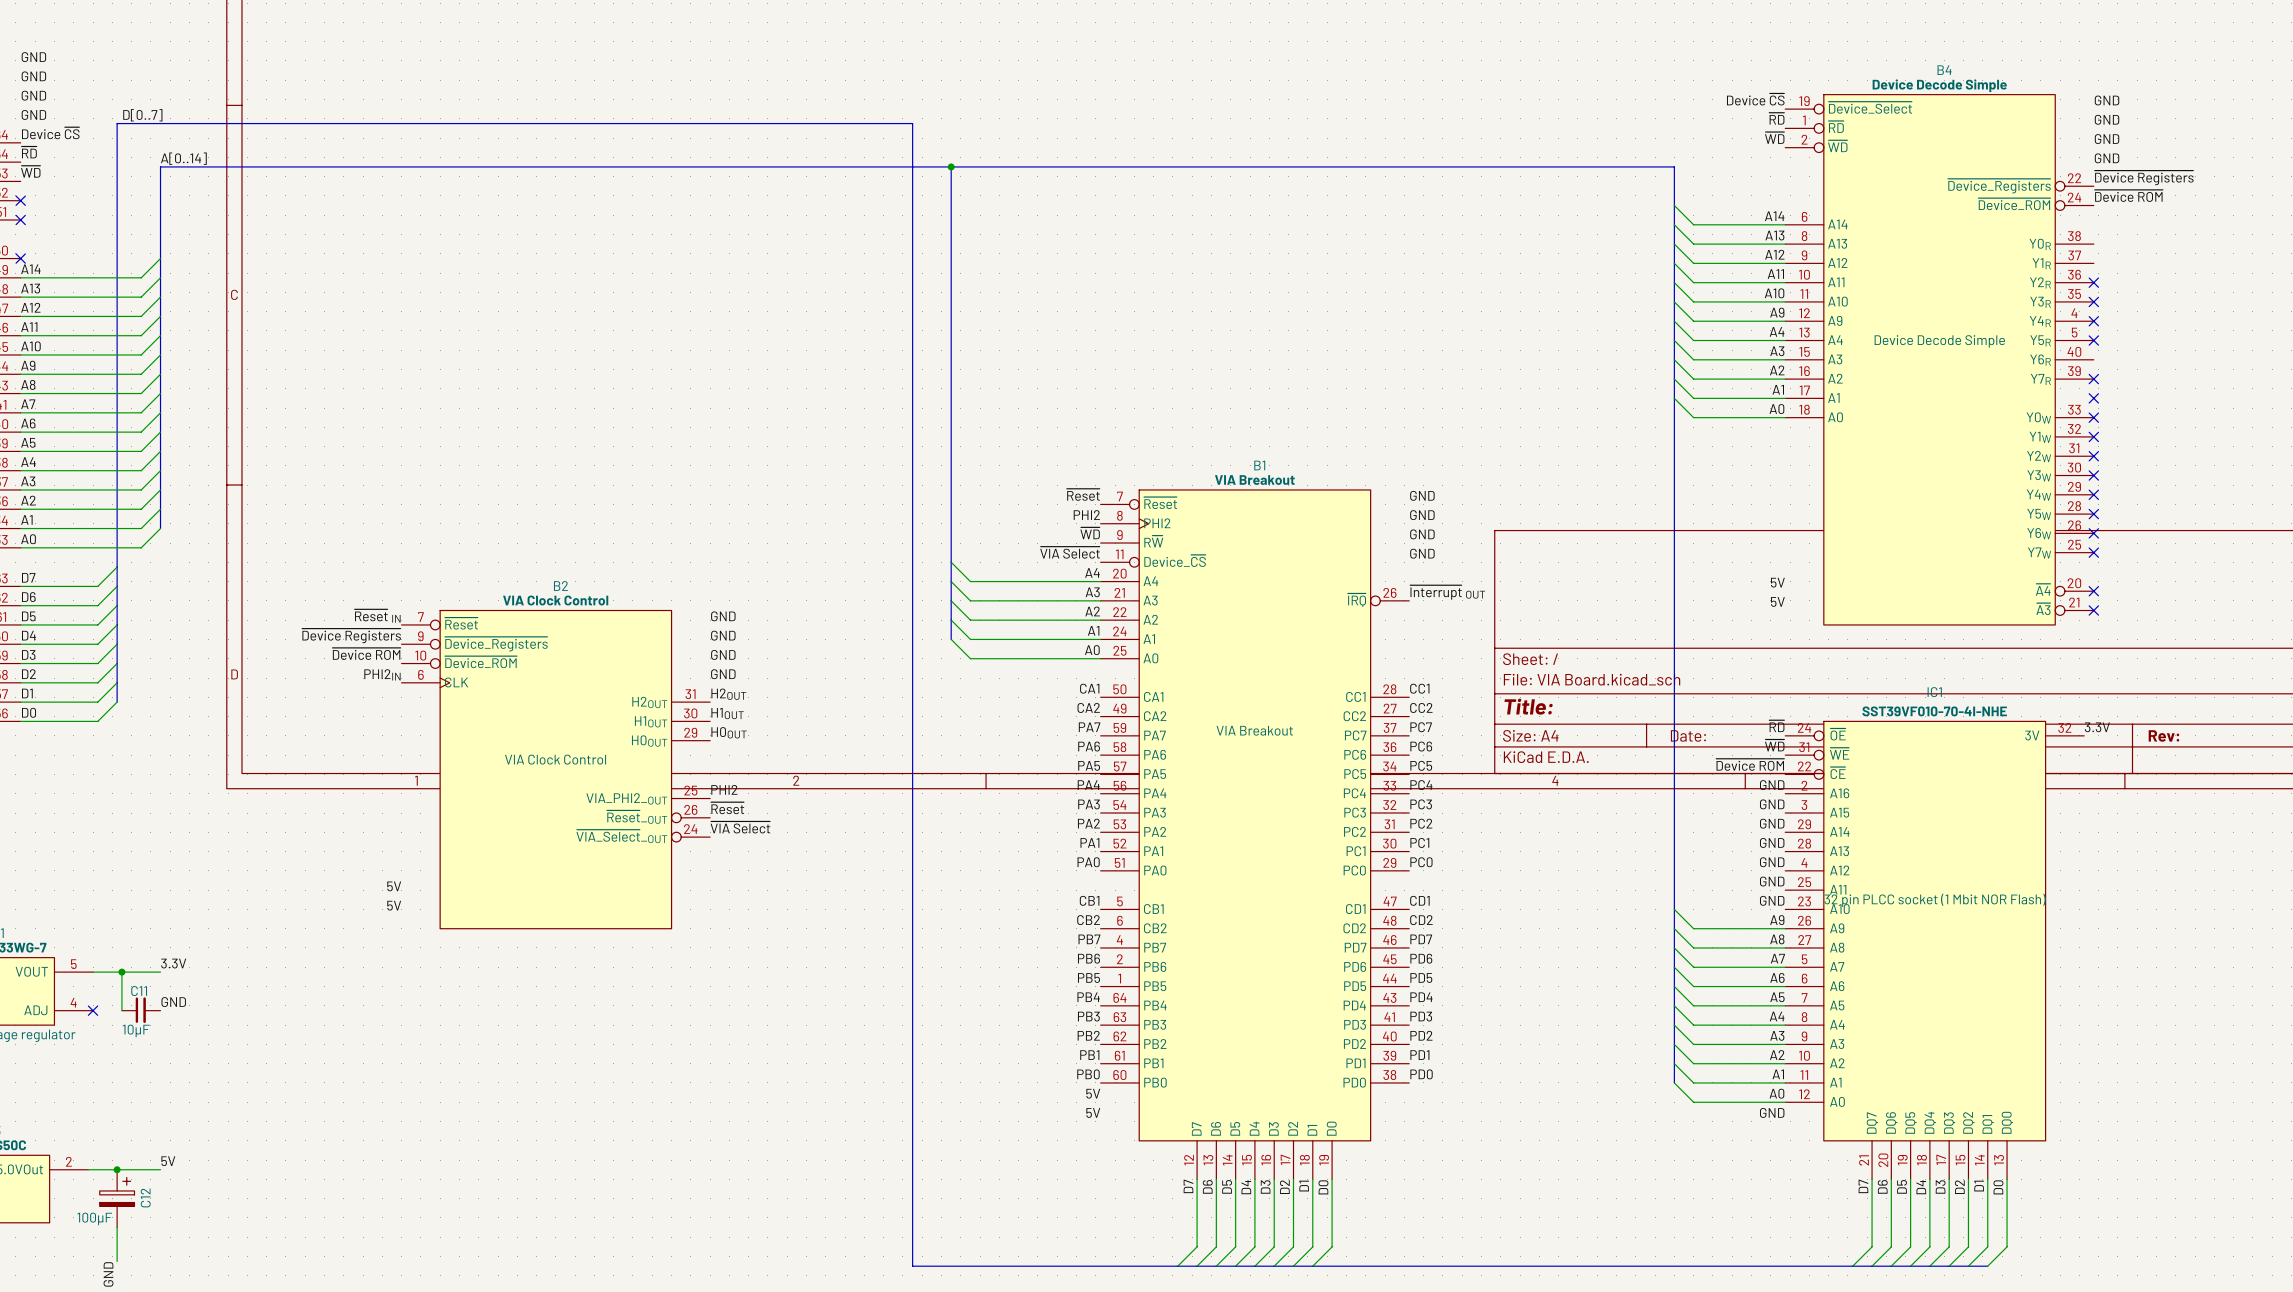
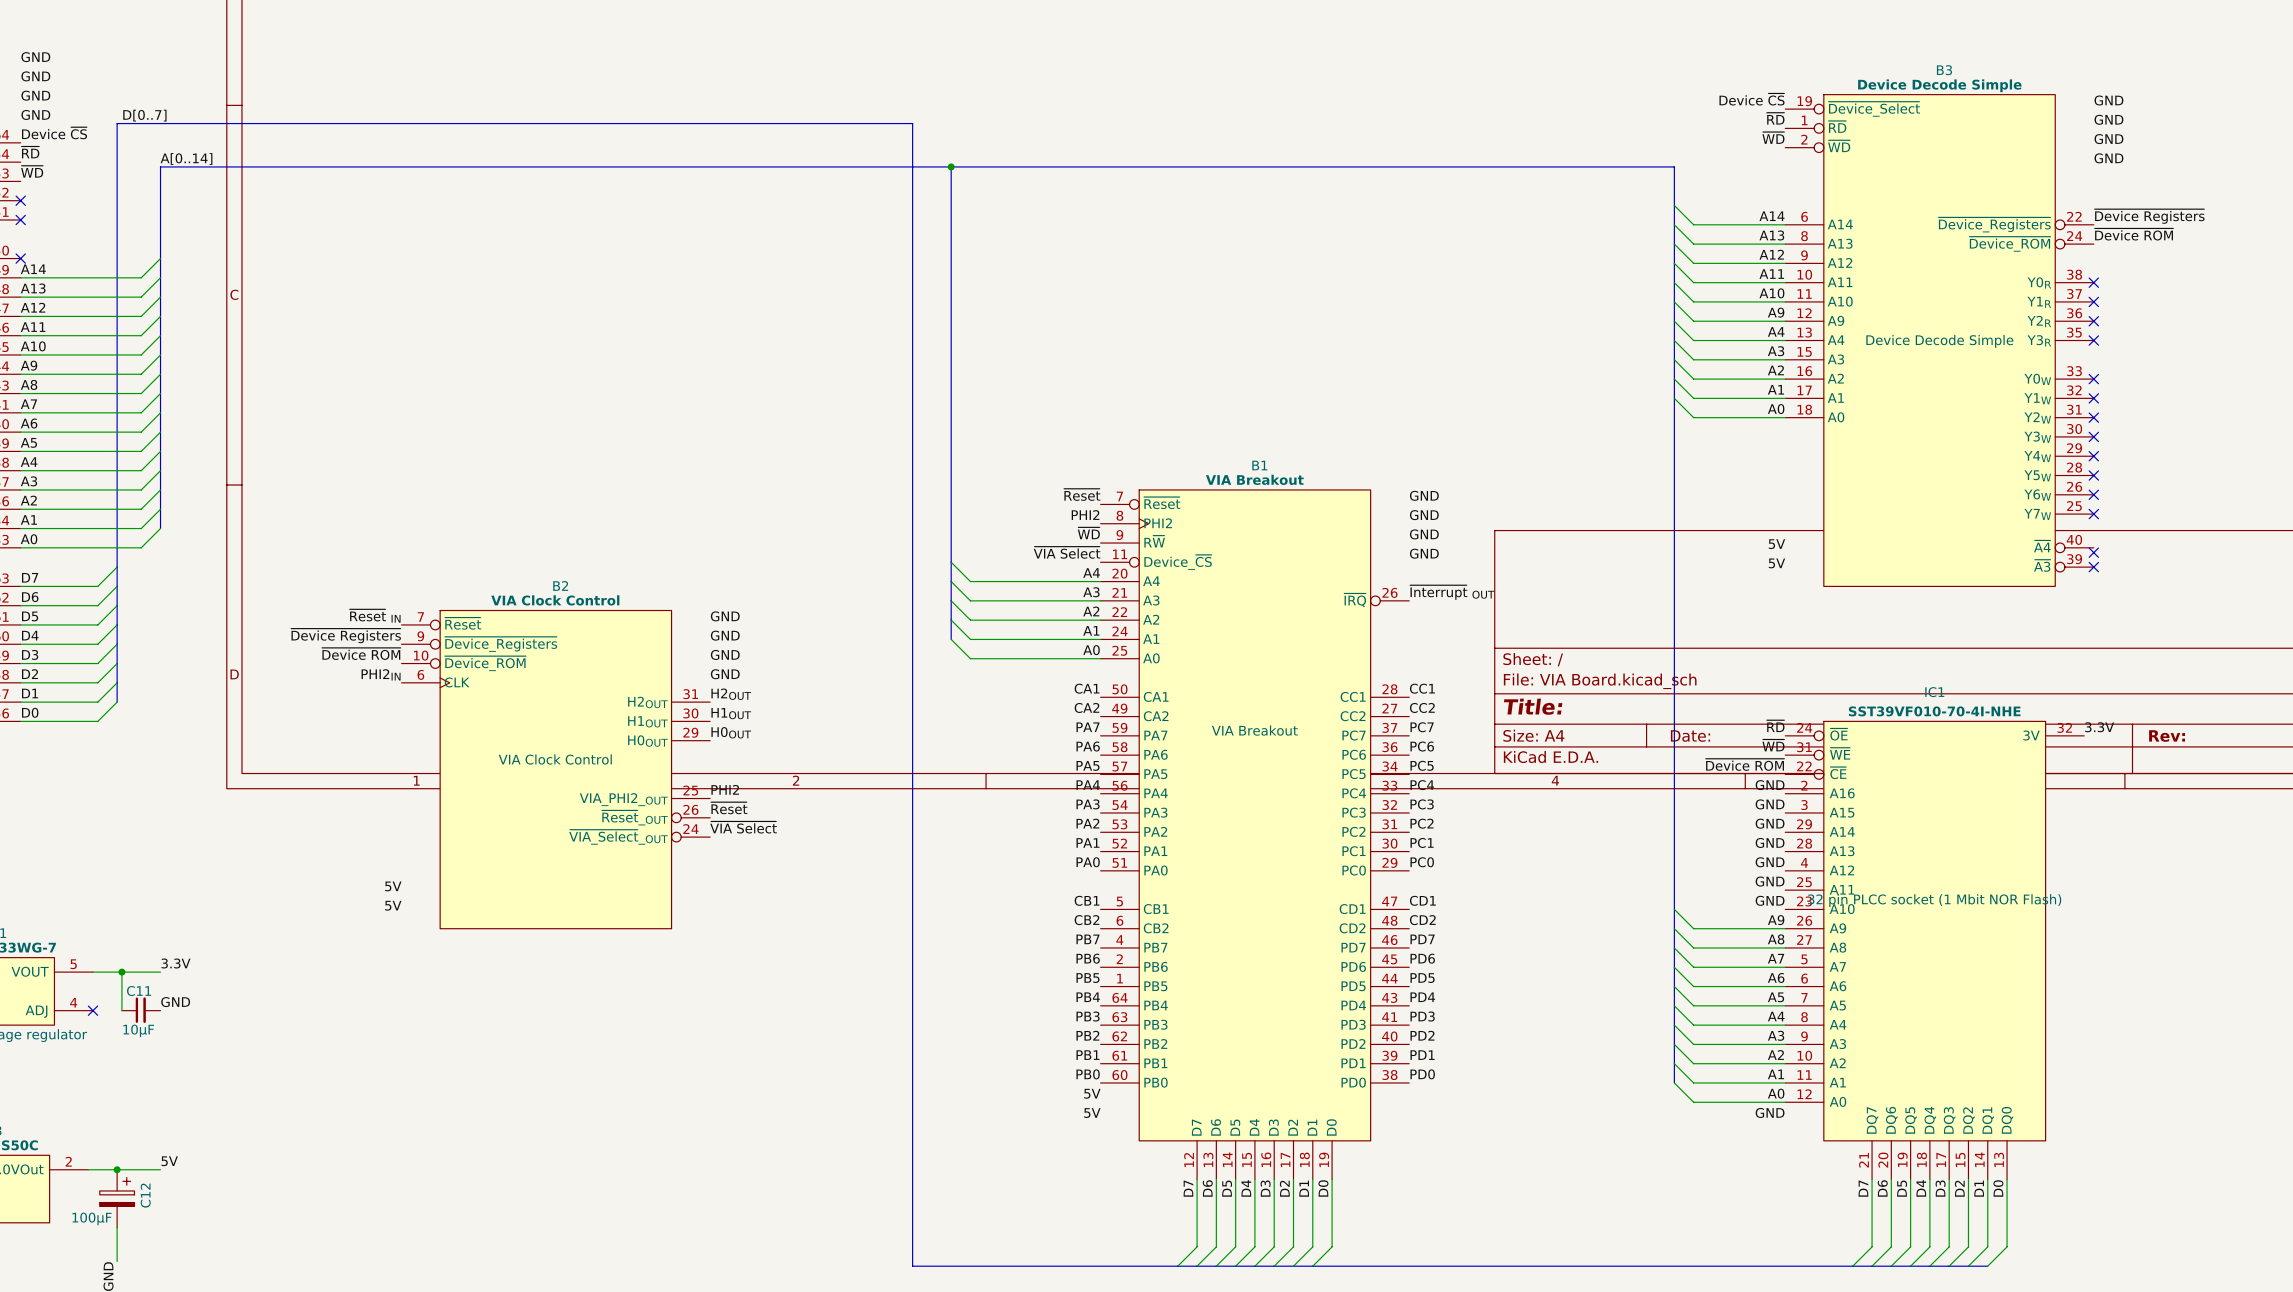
label position: ~{Device Registers} (2144, 177) -> ~{Device Registers} (2149, 216)
label position: ~{Device ROM} (2128, 195) -> ~{Device ROM} (2134, 234)
B3: none -> Device Decode Simple (1939, 340)
B4: Device Decode Simple (1939, 359) -> none
no-connect mark: (2093, 533) -> none
label: none -> 5V (1776, 544)
no-connect mark: none -> (2093, 567)
label position: 5V (1777, 582) -> 5V (1776, 563)
no-connect mark: (2093, 591) -> none
label: 5V (1777, 601) -> none
no-connect mark: (2093, 610) -> none

